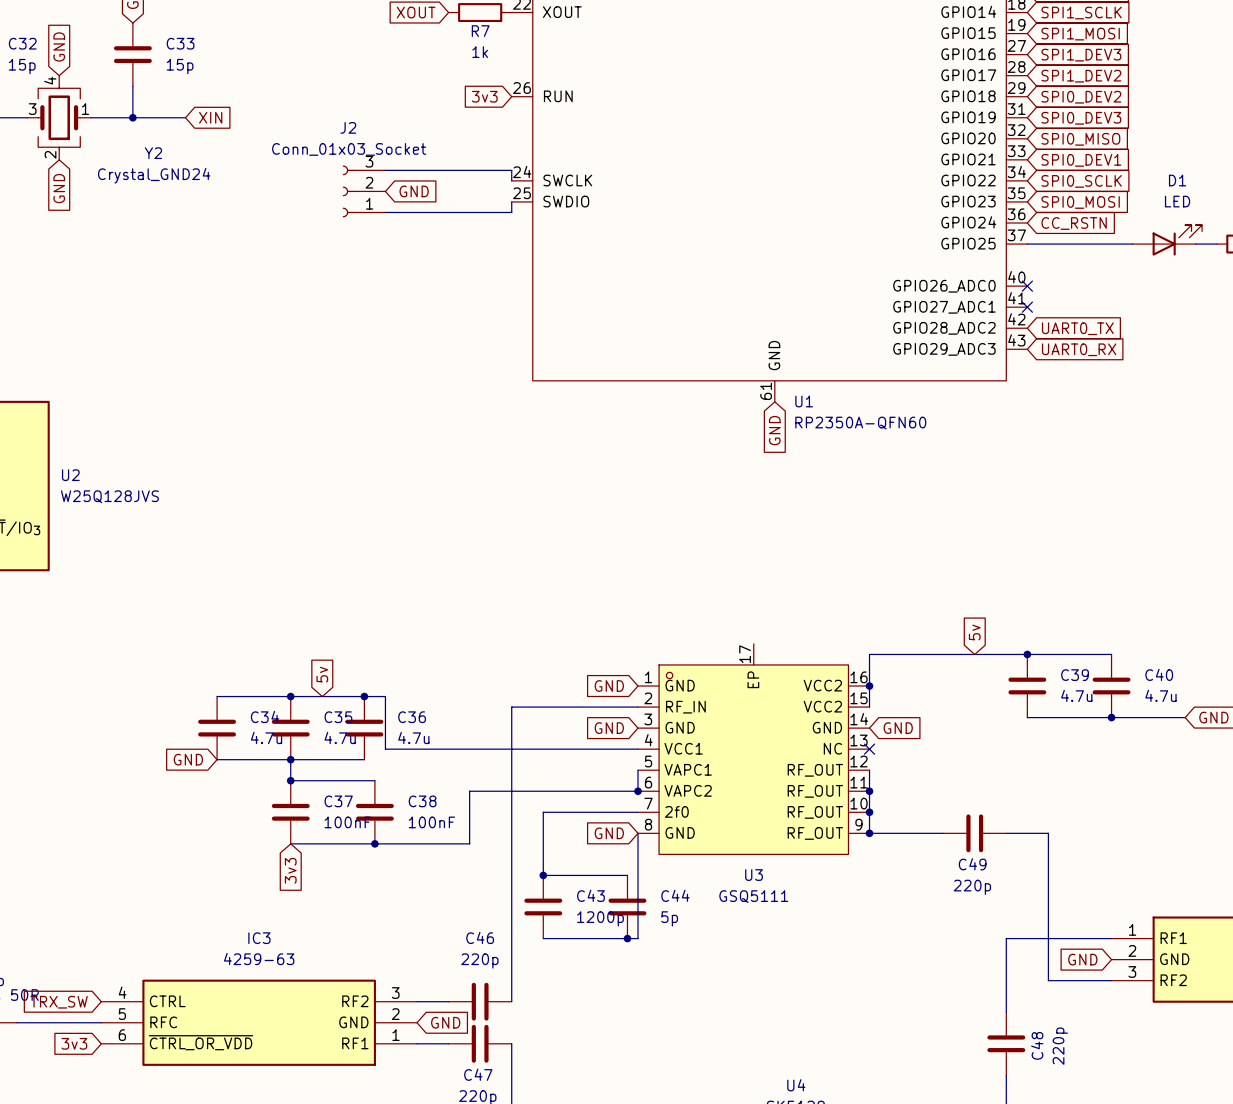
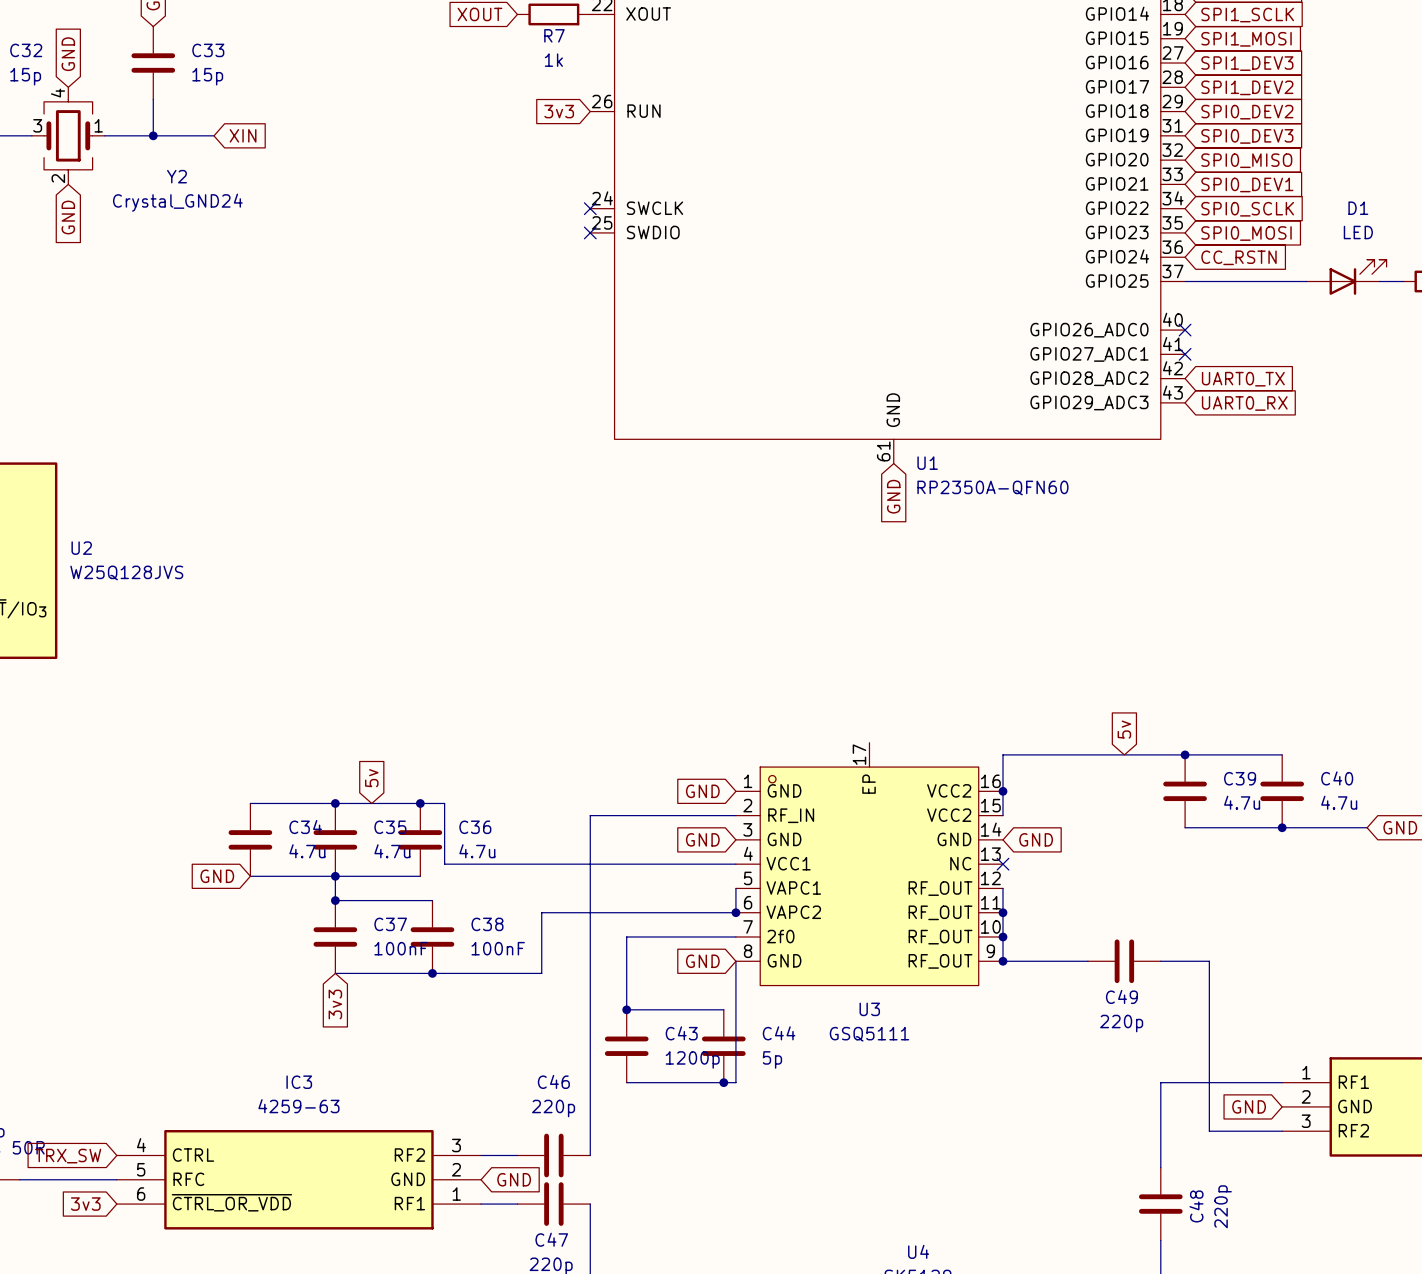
wire: (385, 170) (511, 170) (511, 180) -> none
no-connect mark: none -> (590, 208)
J2: Conn_01x03_Socket (364, 191) -> none
global label: GND (414, 191) -> none
wire: (511, 201) (511, 212) (385, 212) -> none
no-connect mark: none -> (590, 232)

